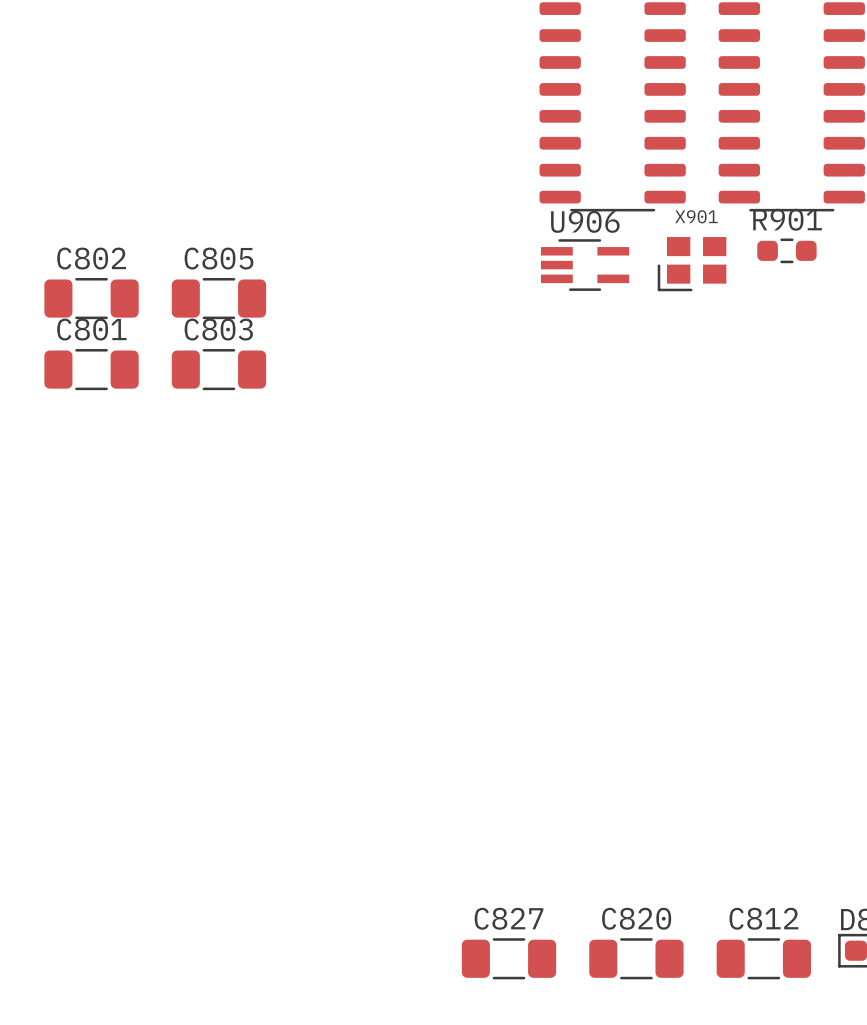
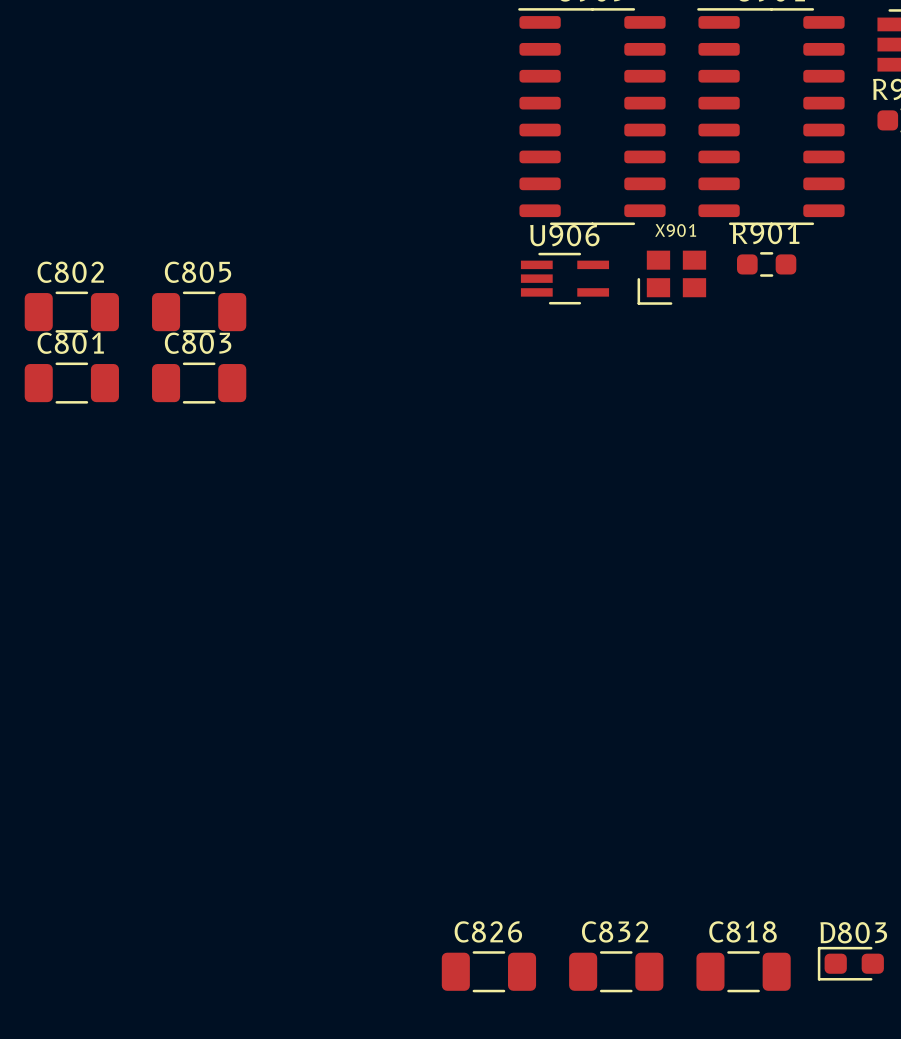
C827 name: C827 (509, 918) -> C826 (488, 931)
C820 name: C820 (636, 918) -> C832 (615, 931)
C812 name: C812 (763, 918) -> C818 (743, 931)

